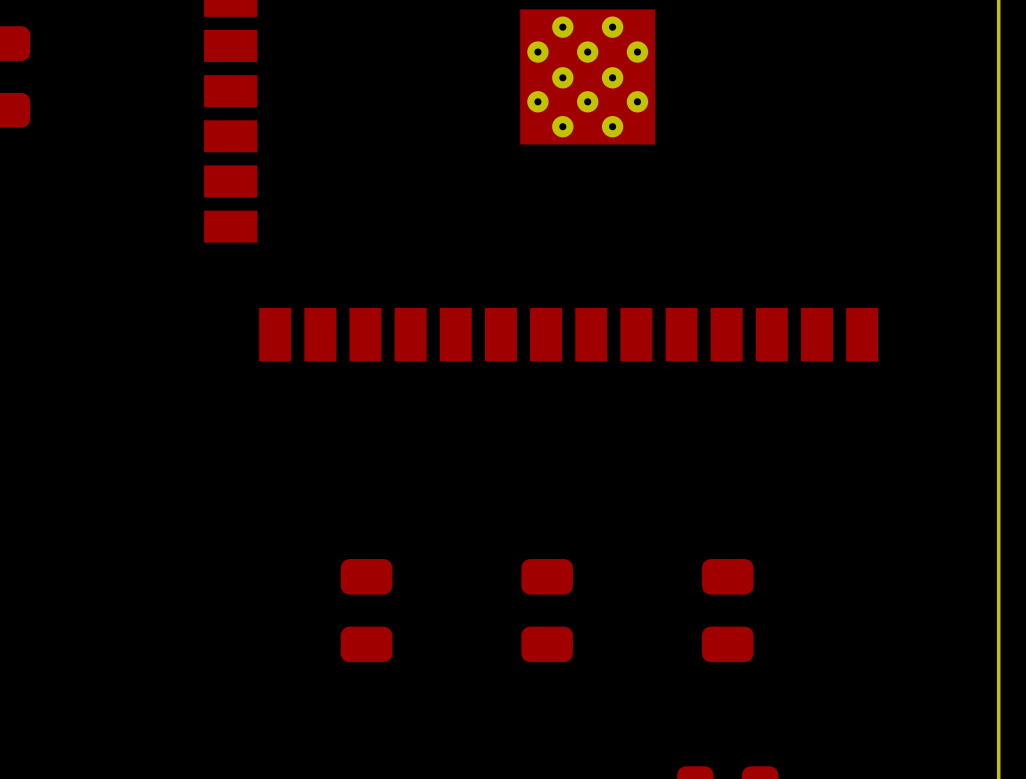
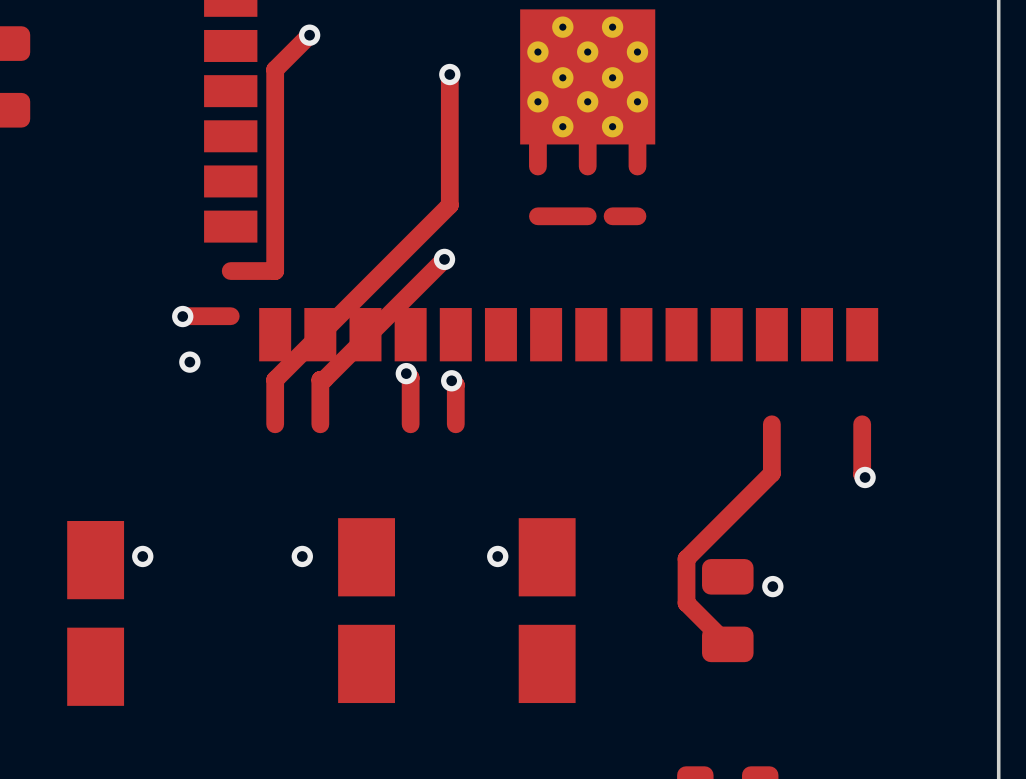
top track: none -> (309, 35) (275, 69) (275, 271) (230, 271)
via: none -> (309, 35)
top track: none -> (449, 74) (449, 205) (275, 379) (275, 424)
via: none -> (449, 74)
top track: none -> (537, 141) (537, 166)
top track: none -> (587, 141) (587, 166)
top track: none -> (637, 141) (637, 166)
top track: none -> (587, 216) (537, 216)
top track: none -> (637, 216) (612, 216)
top track: none -> (444, 259) (324, 379) (320, 379) (320, 424)
via: none -> (444, 259)
via: none -> (182, 316)
top track: none -> (230, 316) (186, 316)
via: none -> (189, 362)
top track: none -> (406, 373) (410, 377) (410, 424)
via: none -> (406, 373)
top track: none -> (451, 380) (455, 384) (455, 424)
via: none -> (451, 380)
top track: none -> (771, 424) (771, 473) (686, 558) (686, 603) (727, 644)
top track: none -> (862, 424) (862, 474) (865, 477)
via: none -> (865, 477)
via: none -> (142, 556)
via: none -> (302, 556)
via: none -> (497, 556)
part footprint: [340, 559, 393, 663] -> [338, 518, 395, 704]
part footprint: [521, 559, 573, 663] -> [518, 518, 576, 704]
via: none -> (772, 586)
part: none -> (95, 613)

